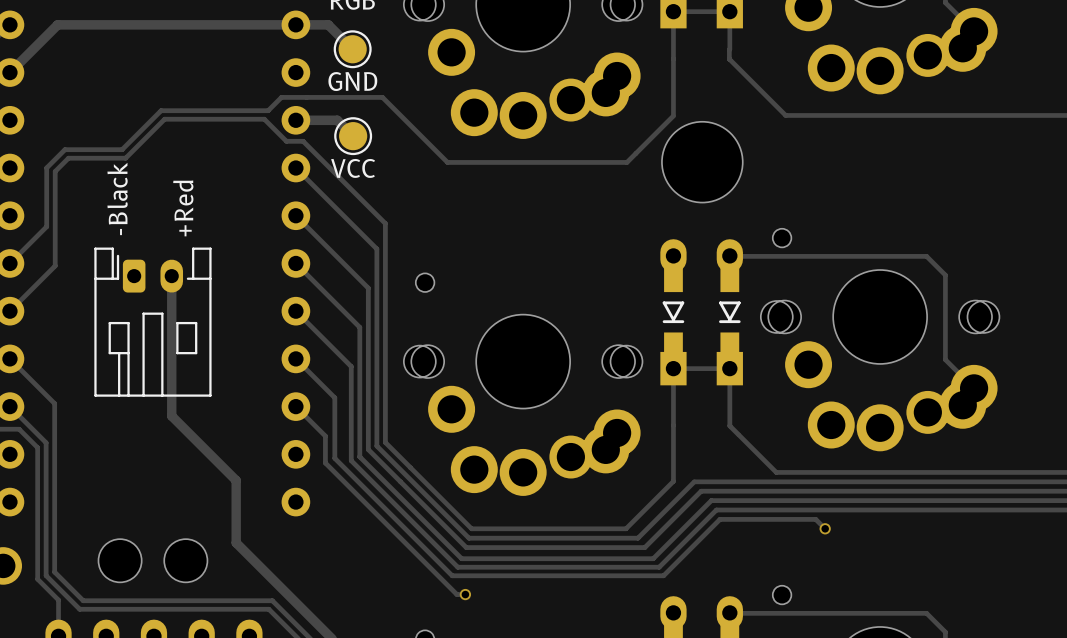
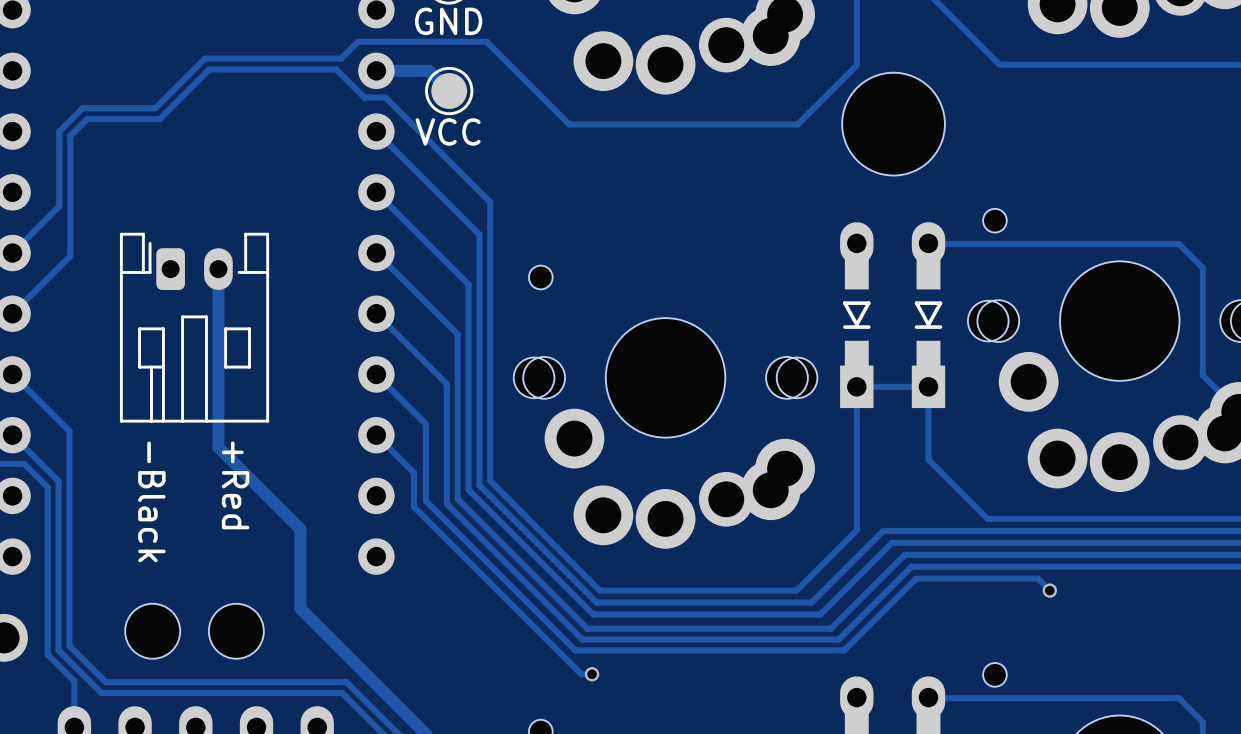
text rotation: 0° (117, 198) -> 180° (151, 501)
text position: -Black (117, 198) -> -Black (151, 501)
text rotation: 0° (183, 208) -> 180° (235, 485)
text position: +Red (183, 208) -> +Red (235, 485)

